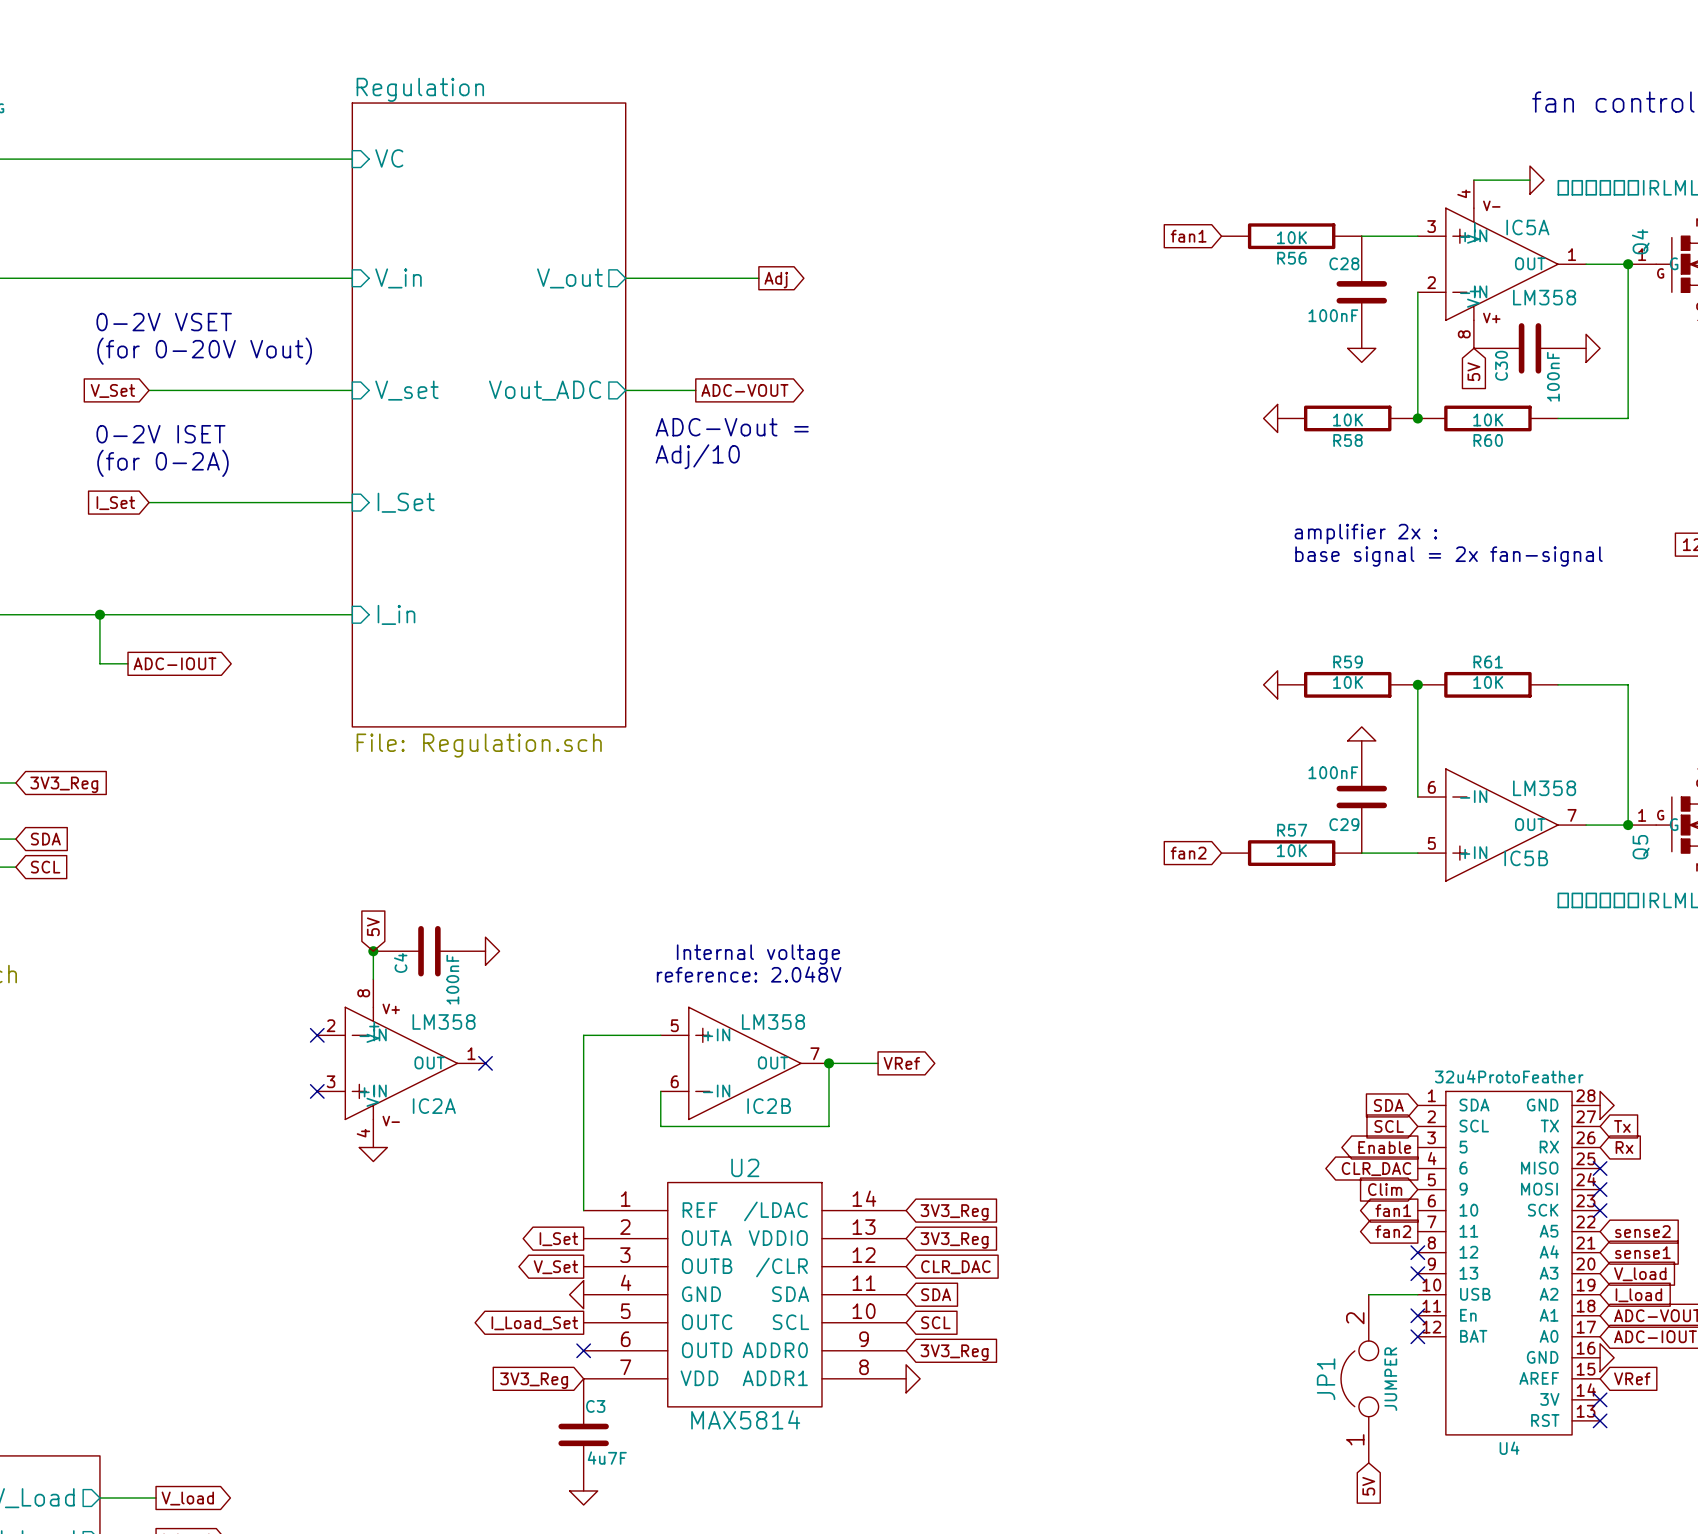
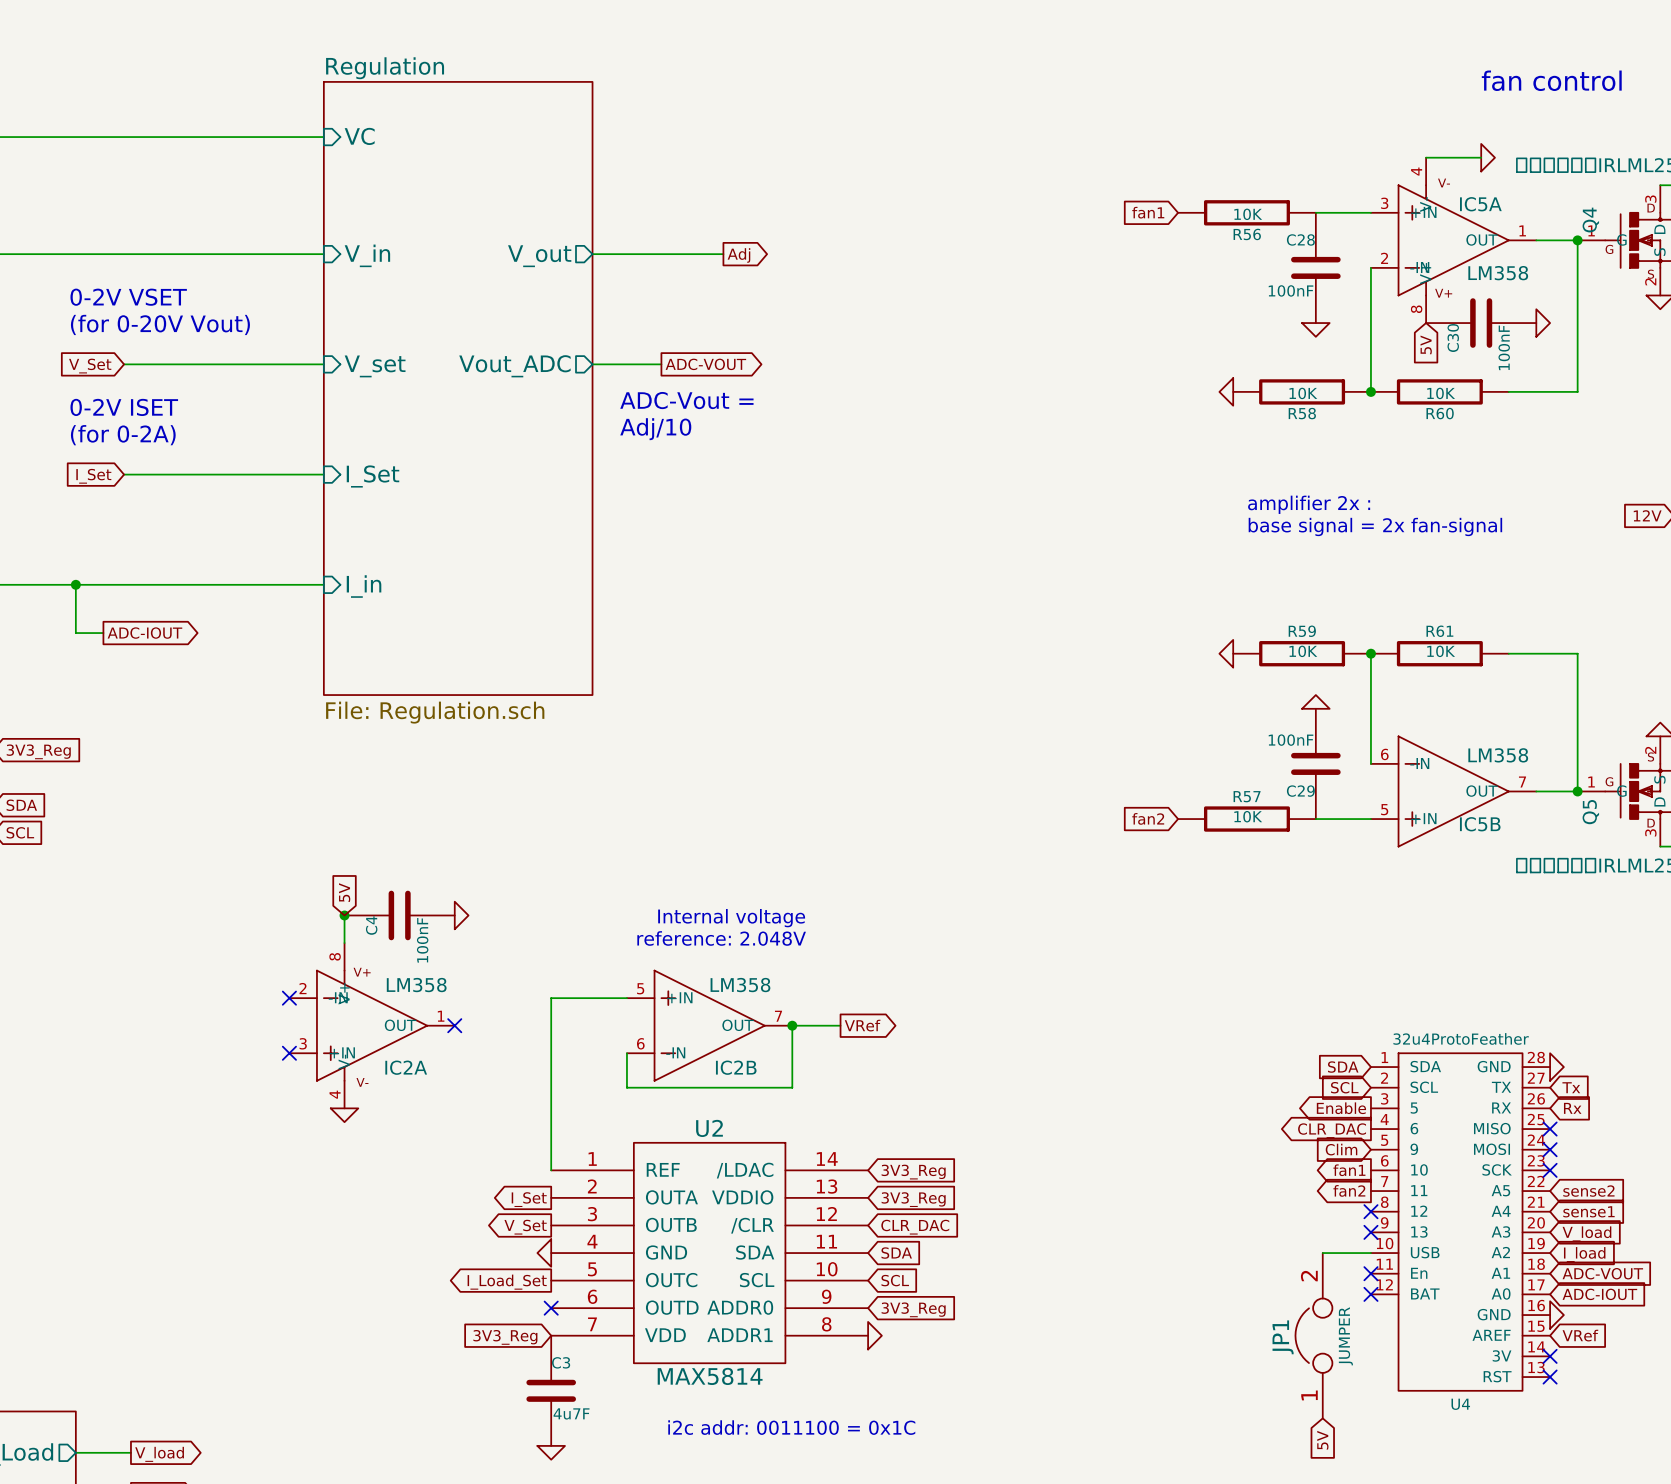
text: none -> i2c addr: 0011100 = 0x1C (791, 1427)

